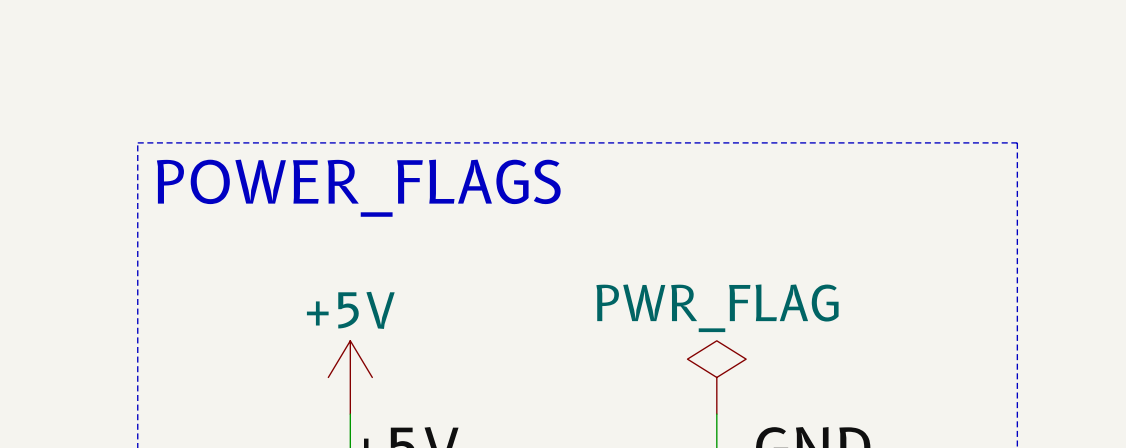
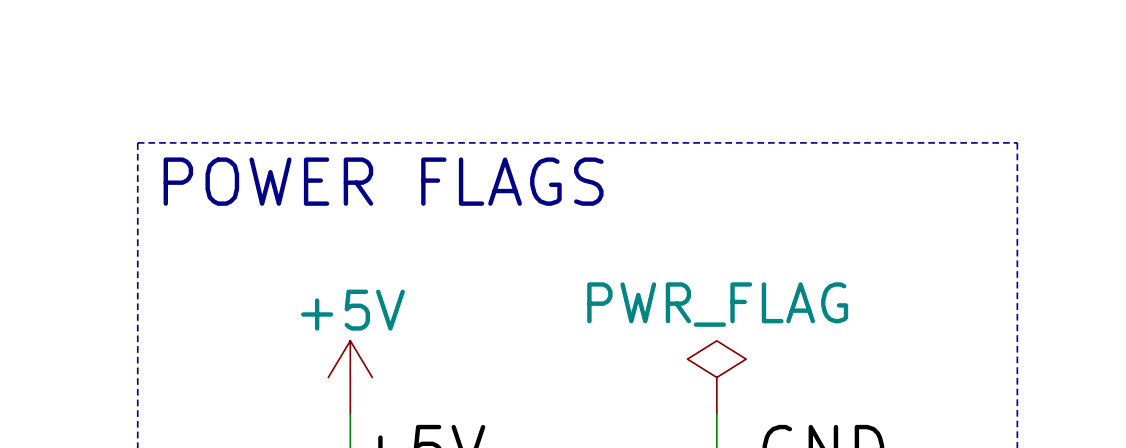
text: POWER_FLAGS (358, 188) -> POWER FLAGS (383, 181)

